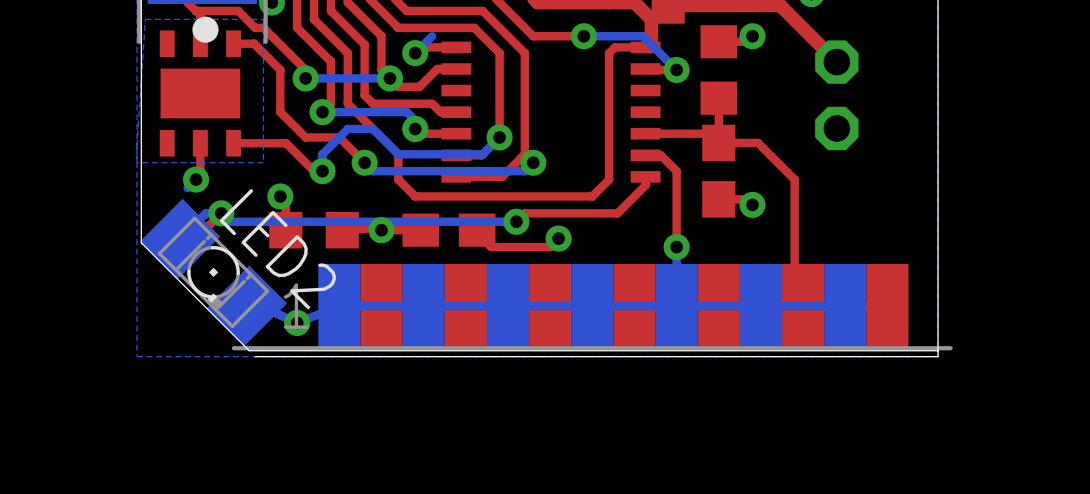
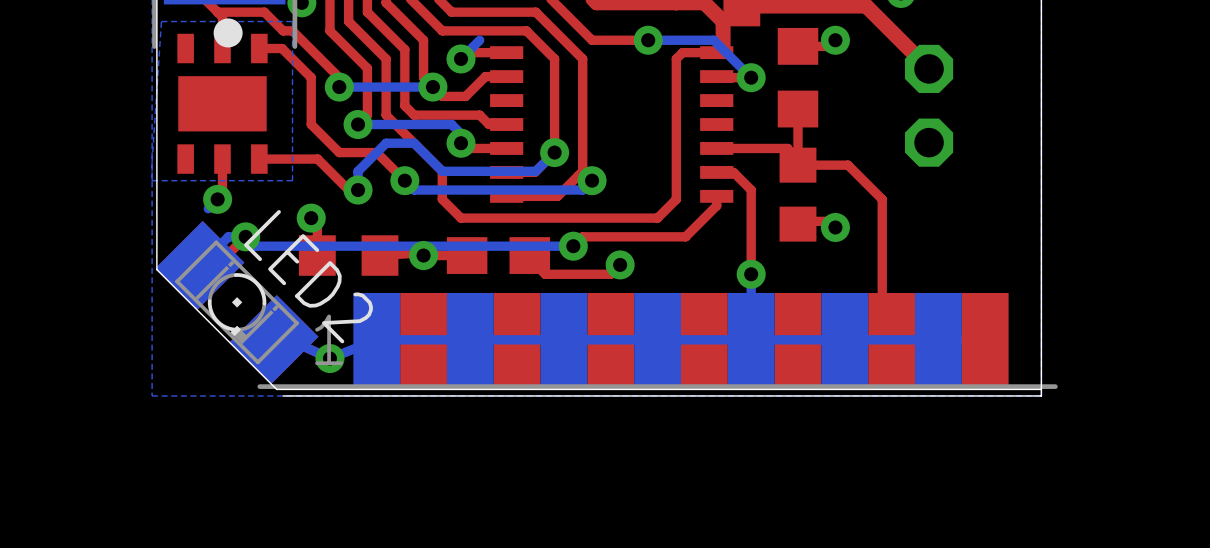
part footprint: [702, 124, 736, 218] -> [779, 147, 817, 242]
top track: (709, 133) (718, 142) (758, 142) (763, 148) -> (798, 165) (848, 165)

